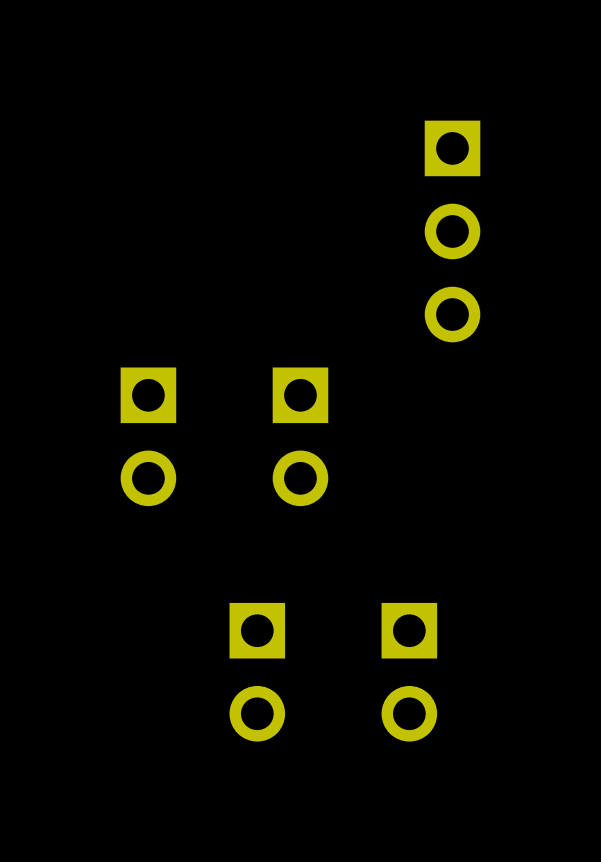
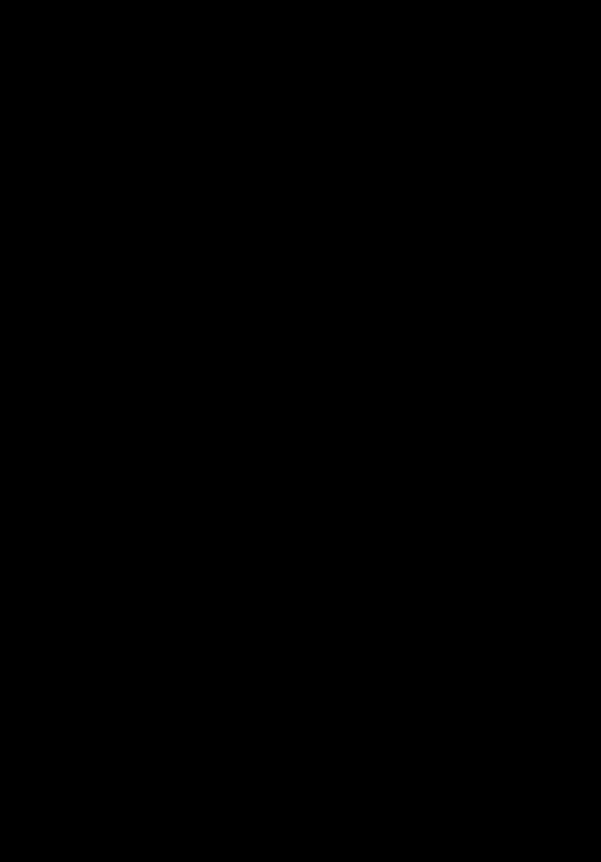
part: (452, 231) -> none
part: (148, 436) -> none
part: (300, 436) -> none
part: (257, 672) -> none
part: (409, 672) -> none

